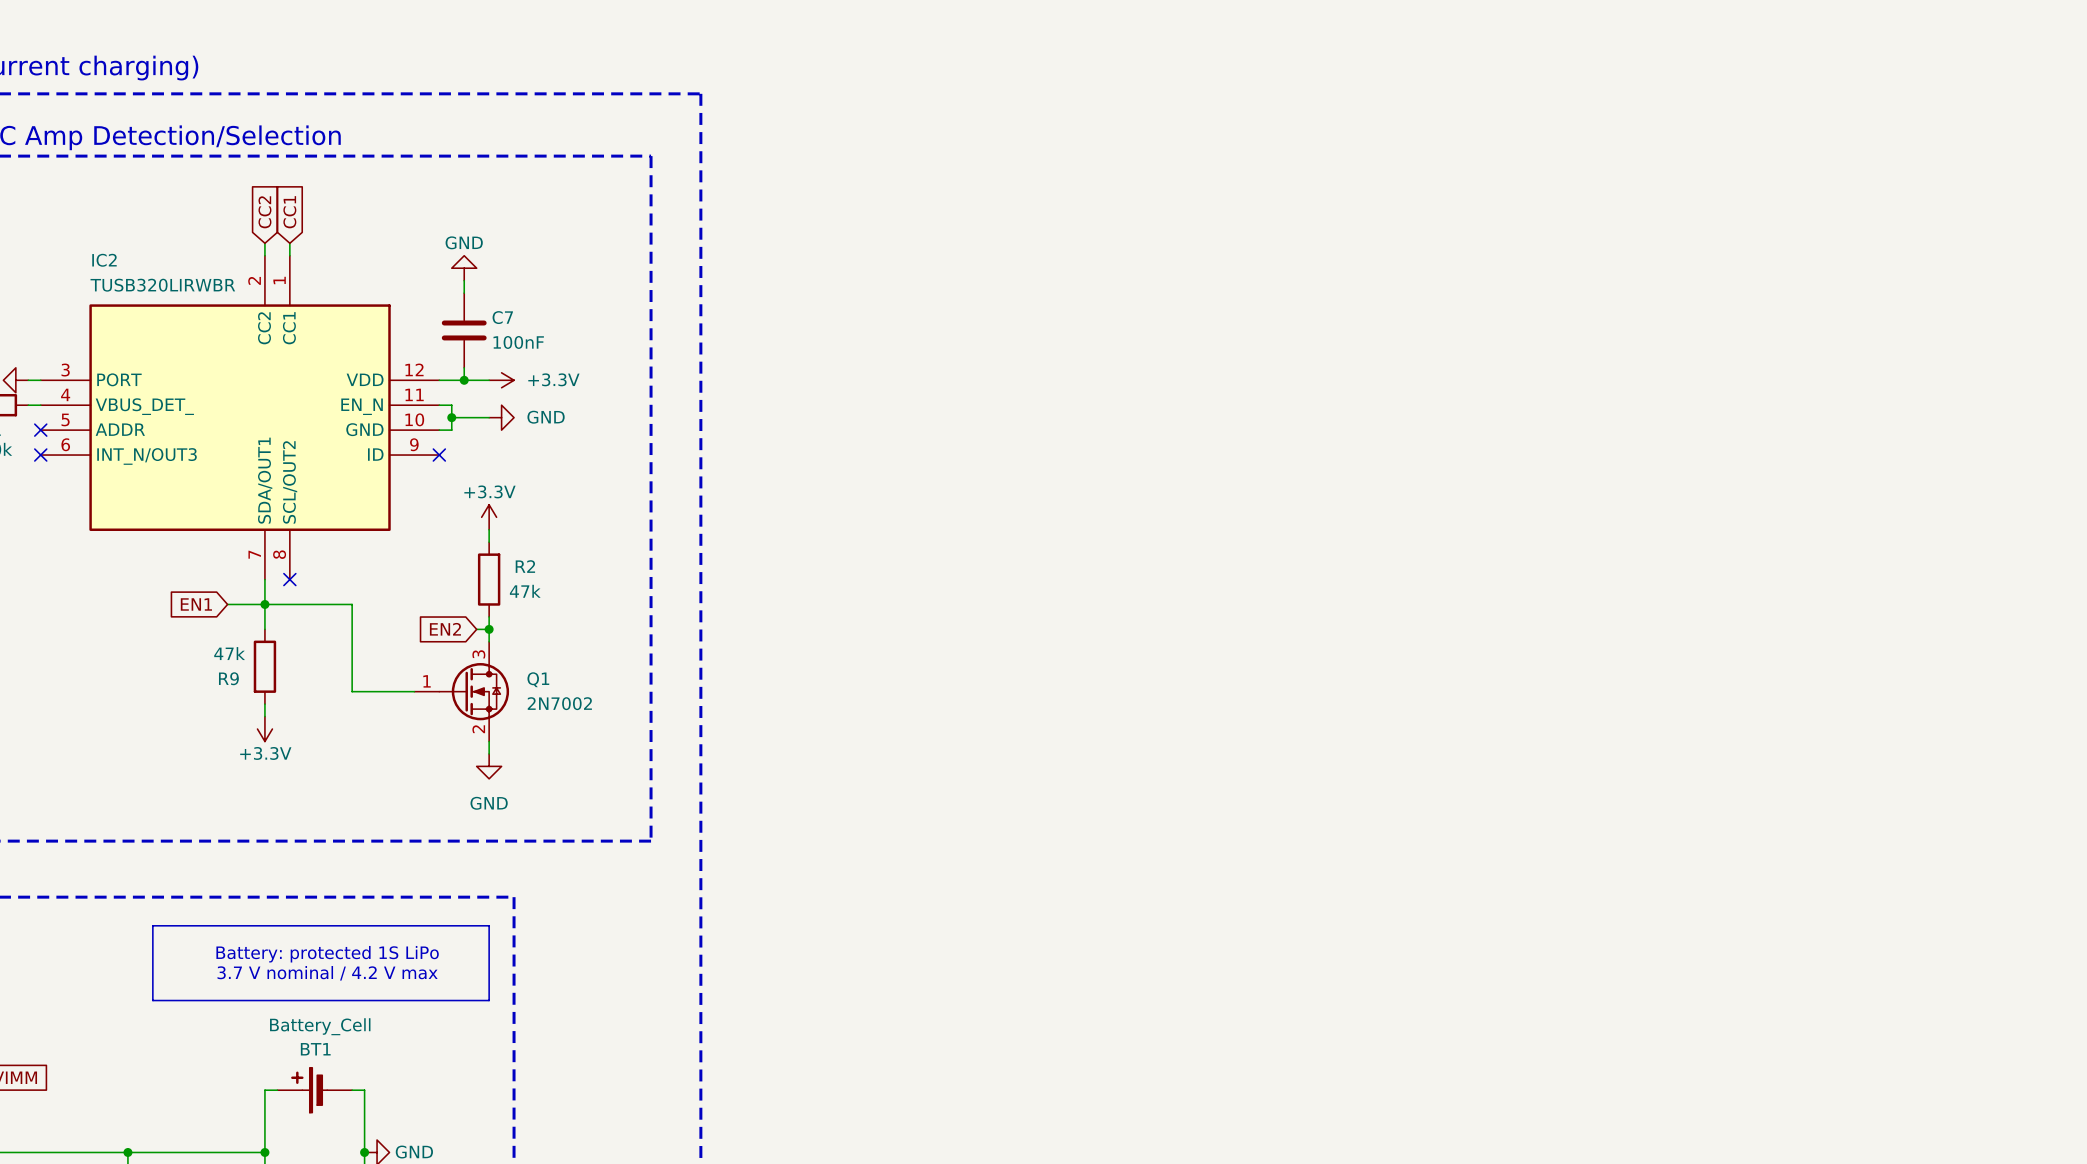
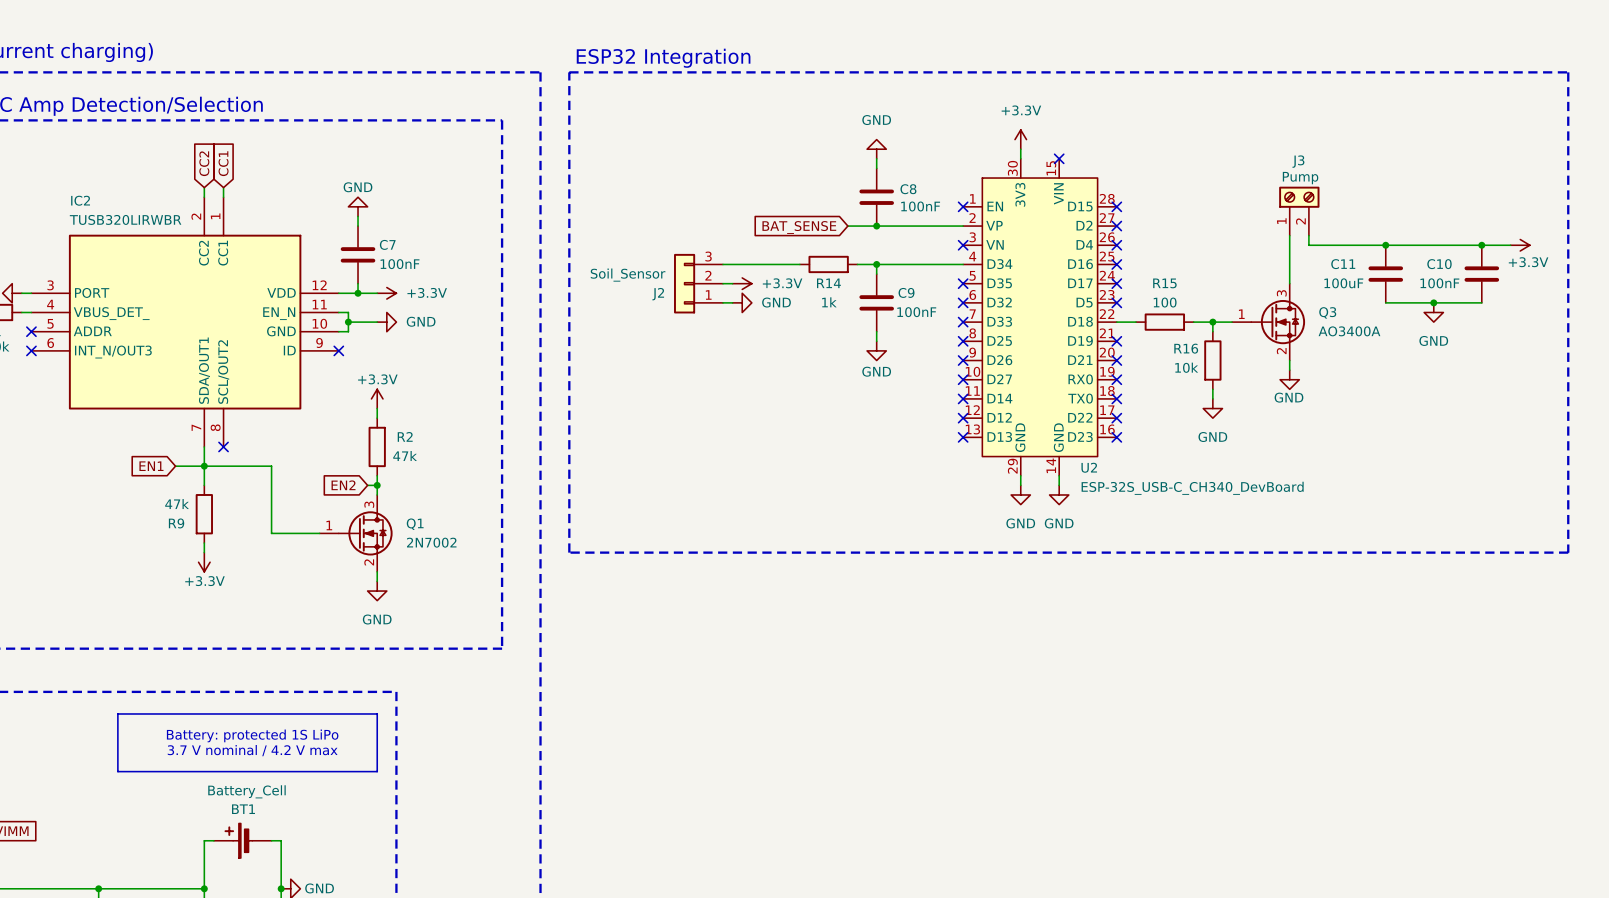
text: none -> ESP32 Integration (663, 58)
line: none -> (569, 72) (1568, 72) (1568, 552) (569, 552) (569, 72)
power symbol: none -> +3.3V (1020, 139)
power symbol: none -> GND (876, 149)
wire: none -> (1020, 149) (1020, 158)
wire: none -> (876, 158) (876, 168)
no-connect mark: none -> (1059, 158)
C8: none -> 100nF (876, 197)
no-connect mark: none -> (963, 206)
no-connect mark: none -> (1116, 206)
J3: none -> Pump (1299, 211)
wire: none -> (847, 226) (963, 226)
junction: none -> (876, 226)
no-connect mark: none -> (1116, 226)
global label: none -> BAT_SENSE (799, 227)
wire: none -> (1289, 235) (1289, 283)
wire: none -> (1308, 235) (1308, 245) (1510, 245)
no-connect mark: none -> (963, 245)
no-connect mark: none -> (1116, 245)
junction: none -> (1385, 245)
junction: none -> (1481, 245)
power symbol: none -> +3.3V (1520, 245)
wire: none -> (723, 264) (799, 264)
R14: none -> 1k (828, 264)
wire: none -> (857, 264) (963, 264)
wire: none -> (876, 264) (876, 274)
junction: none -> (876, 264)
no-connect mark: none -> (1116, 264)
C11: none -> 100uF (1385, 274)
C10: none -> 100nF (1481, 274)
J2: none -> Soil_Sensor (698, 283)
wire: none -> (723, 283) (732, 283)
power symbol: none -> +3.3V (742, 283)
no-connect mark: none -> (963, 283)
no-connect mark: none -> (1116, 283)
wire: none -> (723, 302) (732, 302)
power symbol: none -> GND (742, 302)
C9: none -> 100nF (876, 302)
no-connect mark: none -> (963, 302)
no-connect mark: none -> (1116, 302)
wire: none -> (1385, 302) (1481, 302)
junction: none -> (1433, 302)
power symbol: none -> GND (1433, 312)
U2: none -> ESP-32S_USB-C_CH340_DevBoard (1039, 317)
no-connect mark: none -> (963, 322)
wire: none -> (1116, 322) (1136, 322)
R15: none -> 100 (1164, 322)
wire: none -> (1193, 322) (1232, 322)
wire: none -> (1212, 322) (1212, 331)
junction: none -> (1212, 322)
Q3: none -> AO3400A (1268, 322)
wire: none -> (876, 331) (876, 341)
no-connect mark: none -> (963, 341)
no-connect mark: none -> (1116, 341)
power symbol: none -> GND (876, 350)
no-connect mark: none -> (963, 360)
no-connect mark: none -> (1116, 360)
R16: none -> 10k (1212, 360)
wire: none -> (1289, 360) (1289, 370)
no-connect mark: none -> (963, 379)
no-connect mark: none -> (1116, 379)
power symbol: none -> GND (1289, 379)
wire: none -> (1212, 389) (1212, 398)
no-connect mark: none -> (963, 398)
no-connect mark: none -> (1116, 398)
power symbol: none -> GND (1212, 408)
no-connect mark: none -> (963, 418)
no-connect mark: none -> (1116, 418)
no-connect mark: none -> (963, 437)
no-connect mark: none -> (1116, 437)
wire: none -> (1020, 475) (1020, 485)
wire: none -> (1059, 475) (1059, 485)
power symbol: none -> GND (1020, 494)
power symbol: none -> GND (1059, 494)

